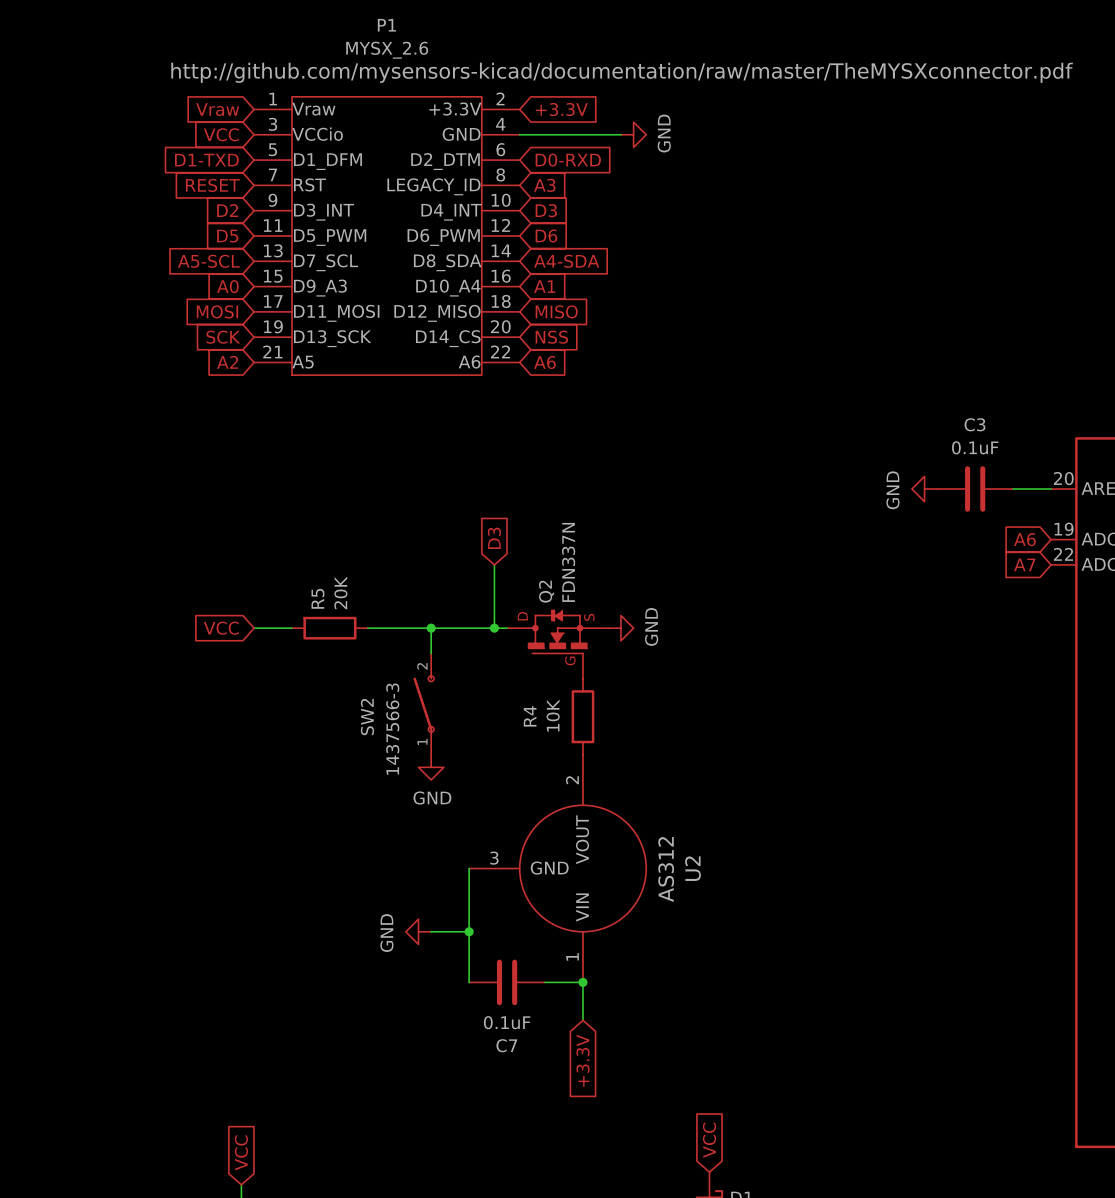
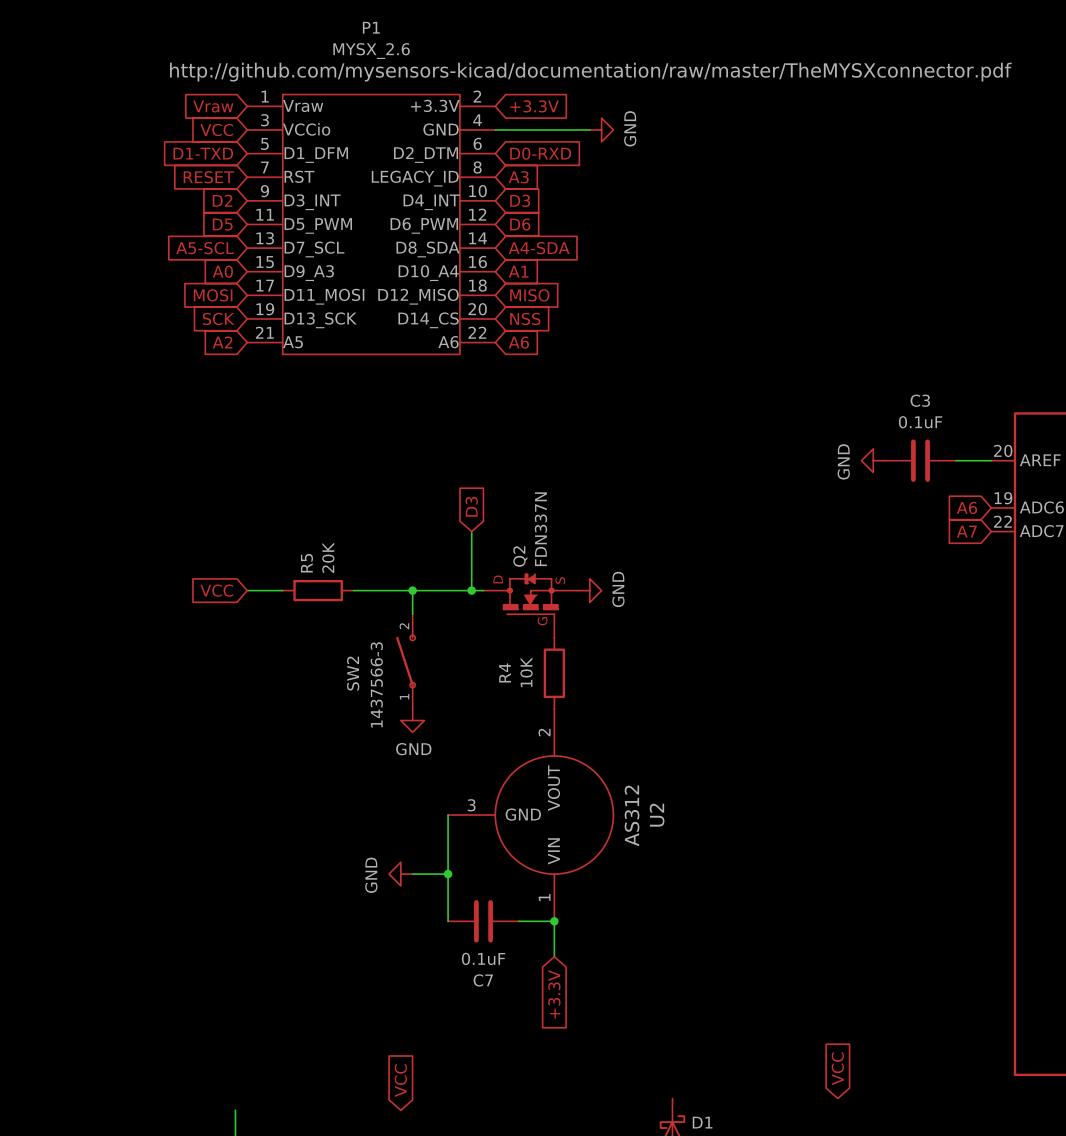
global label: VCC (709, 1140) -> none
global label: none -> VCC (837, 1068)
global label: VCC (241, 1152) -> none
global label: none -> VCC (400, 1080)

